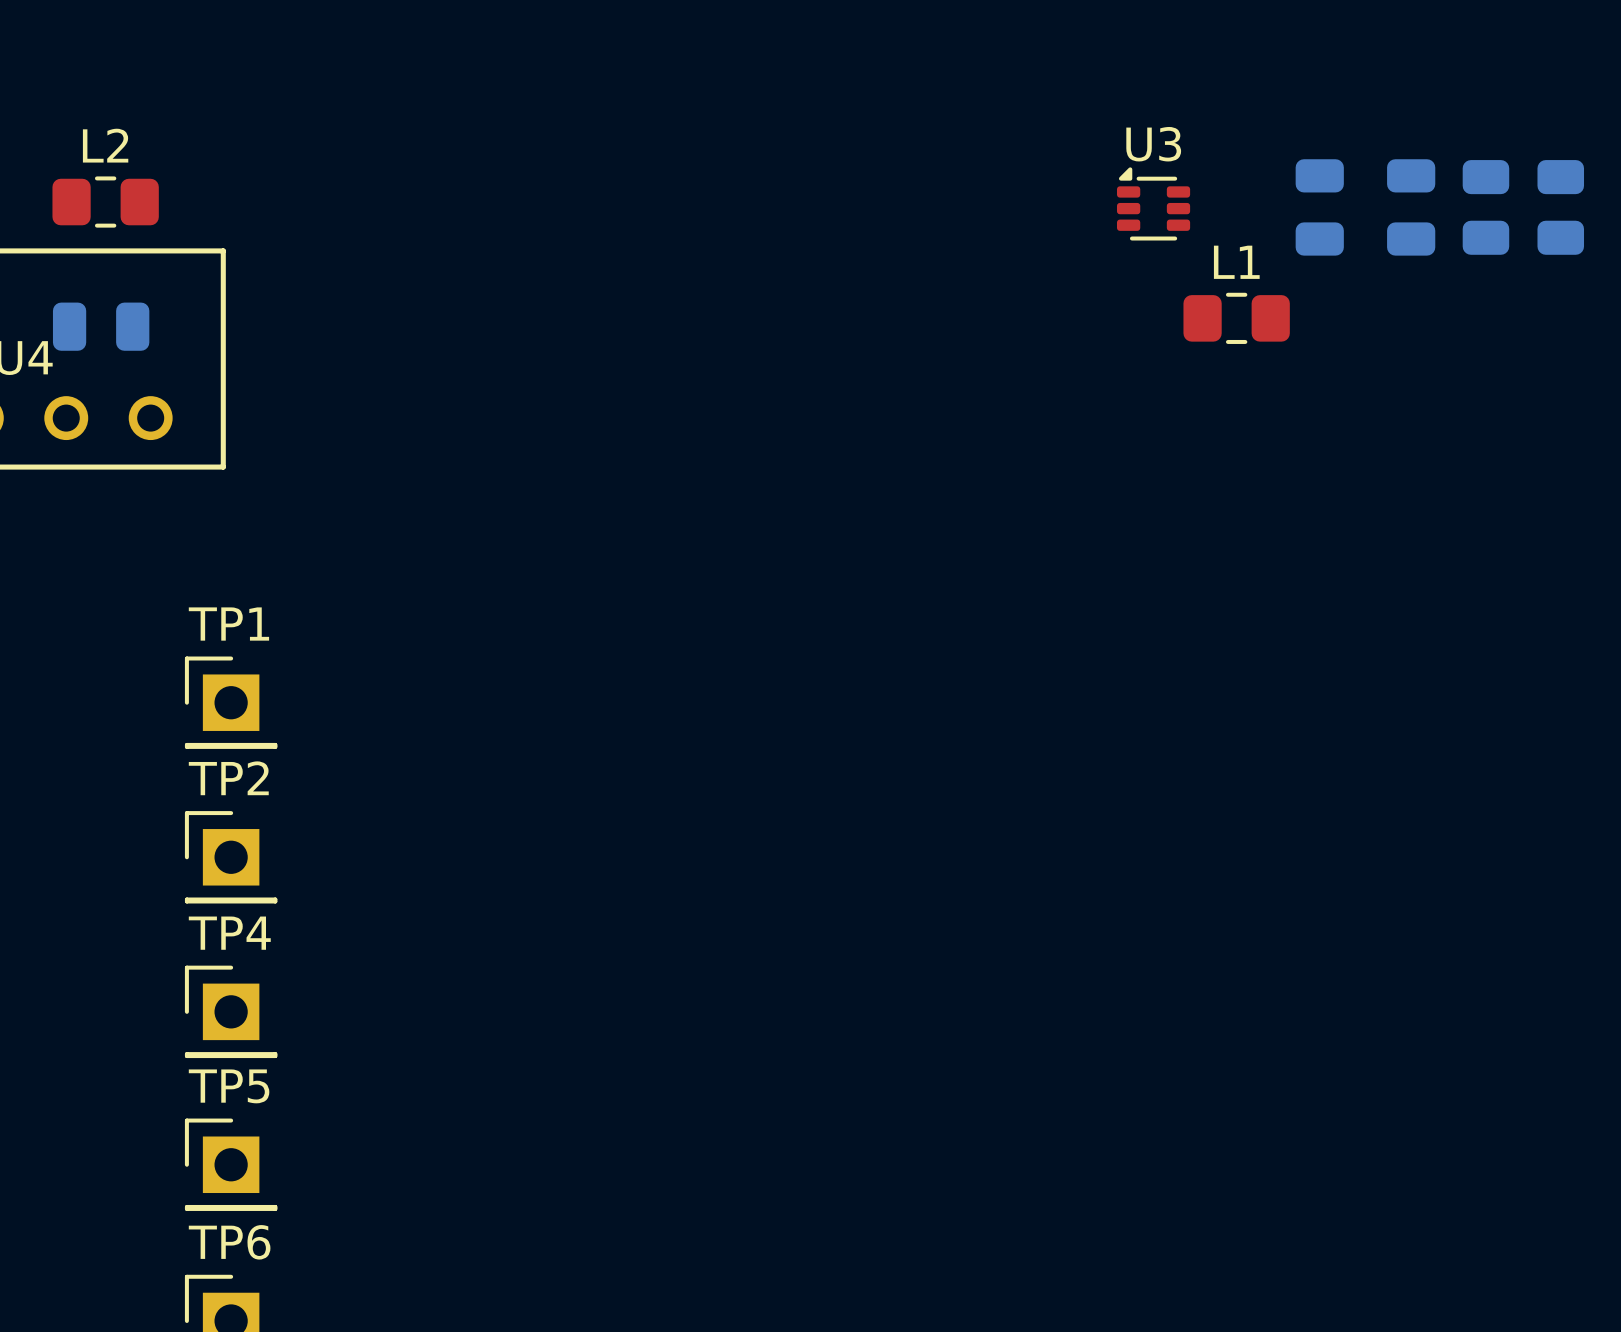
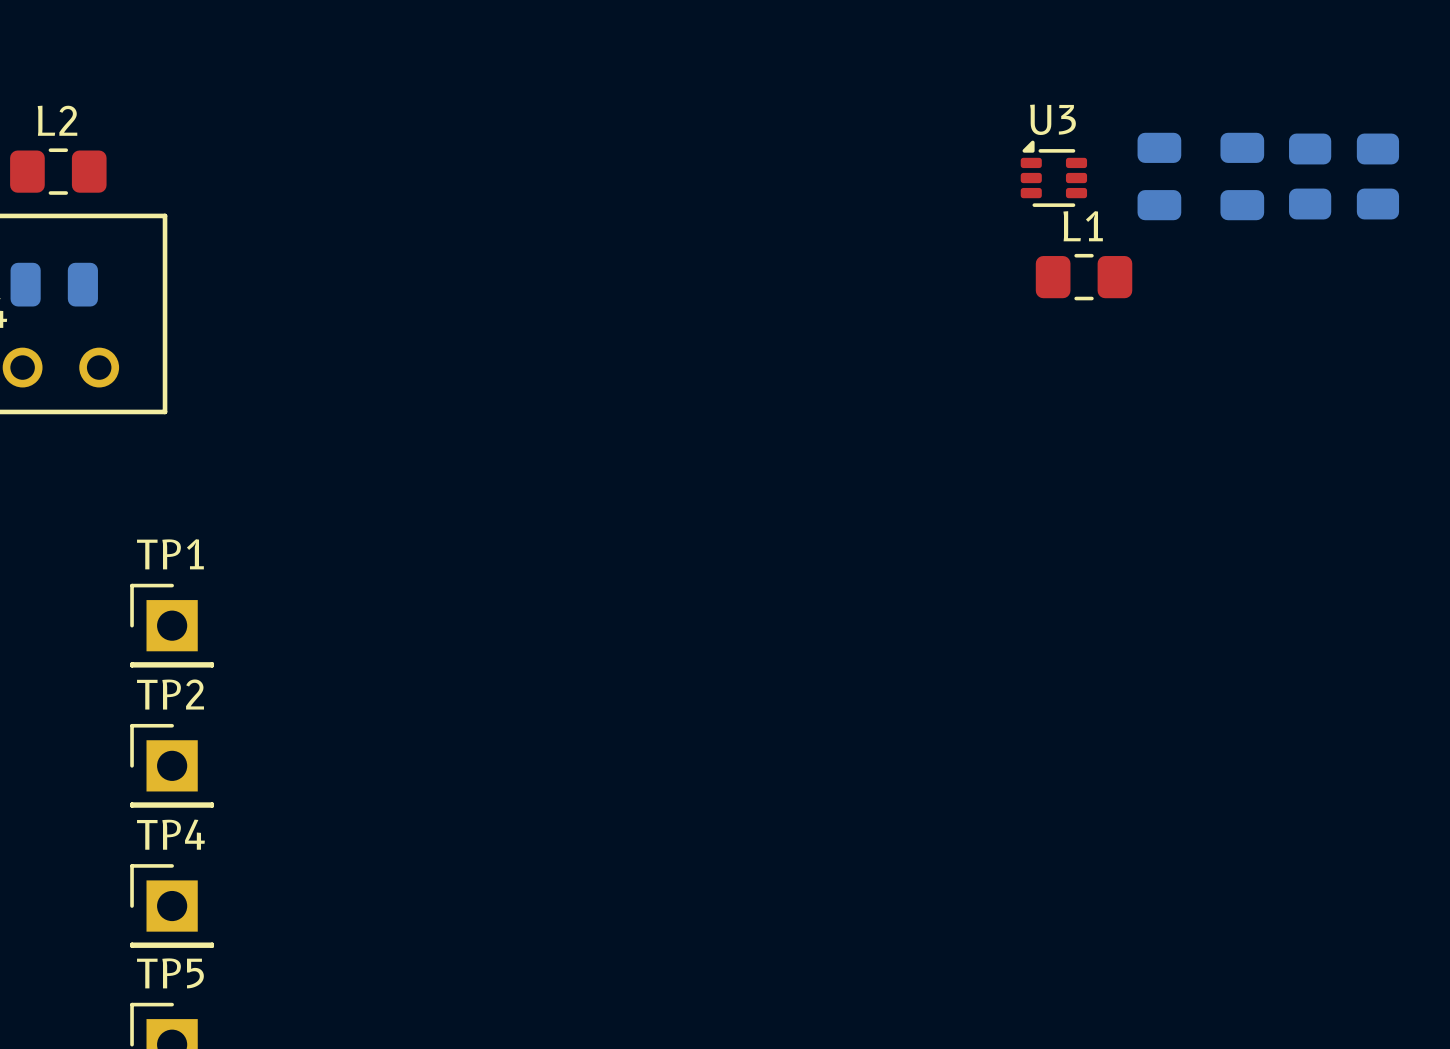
U3 position: (1153, 203) -> (1053, 173)

